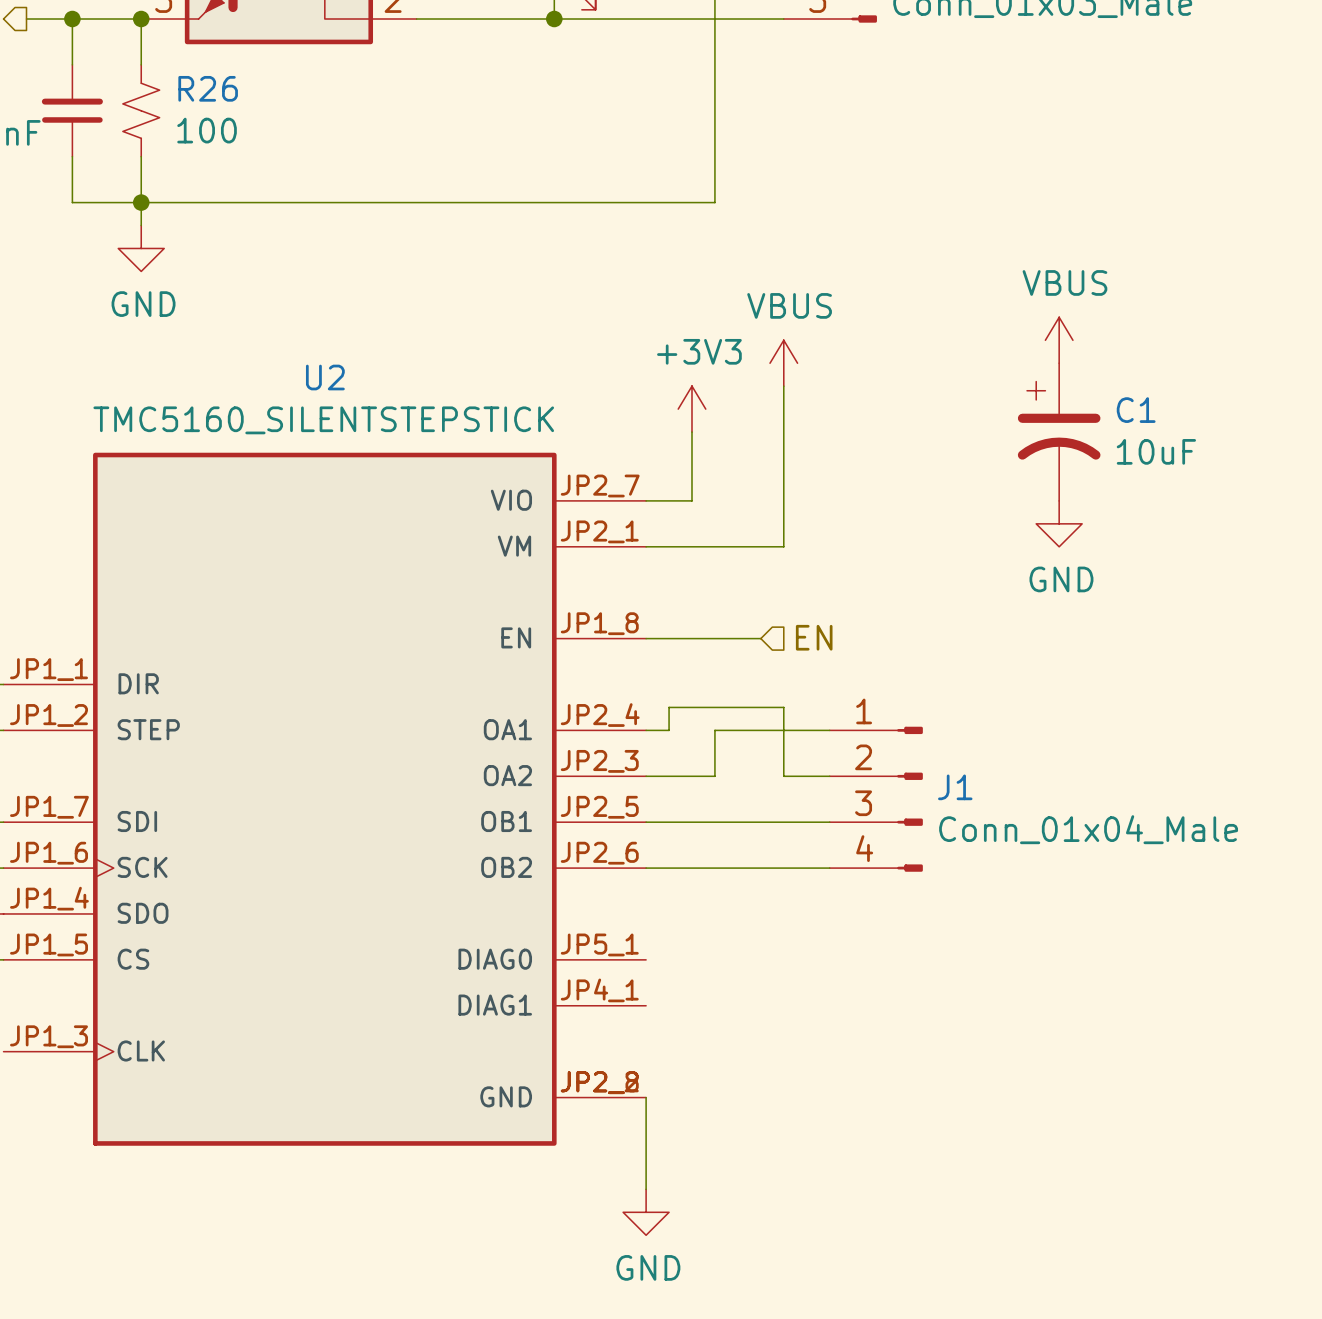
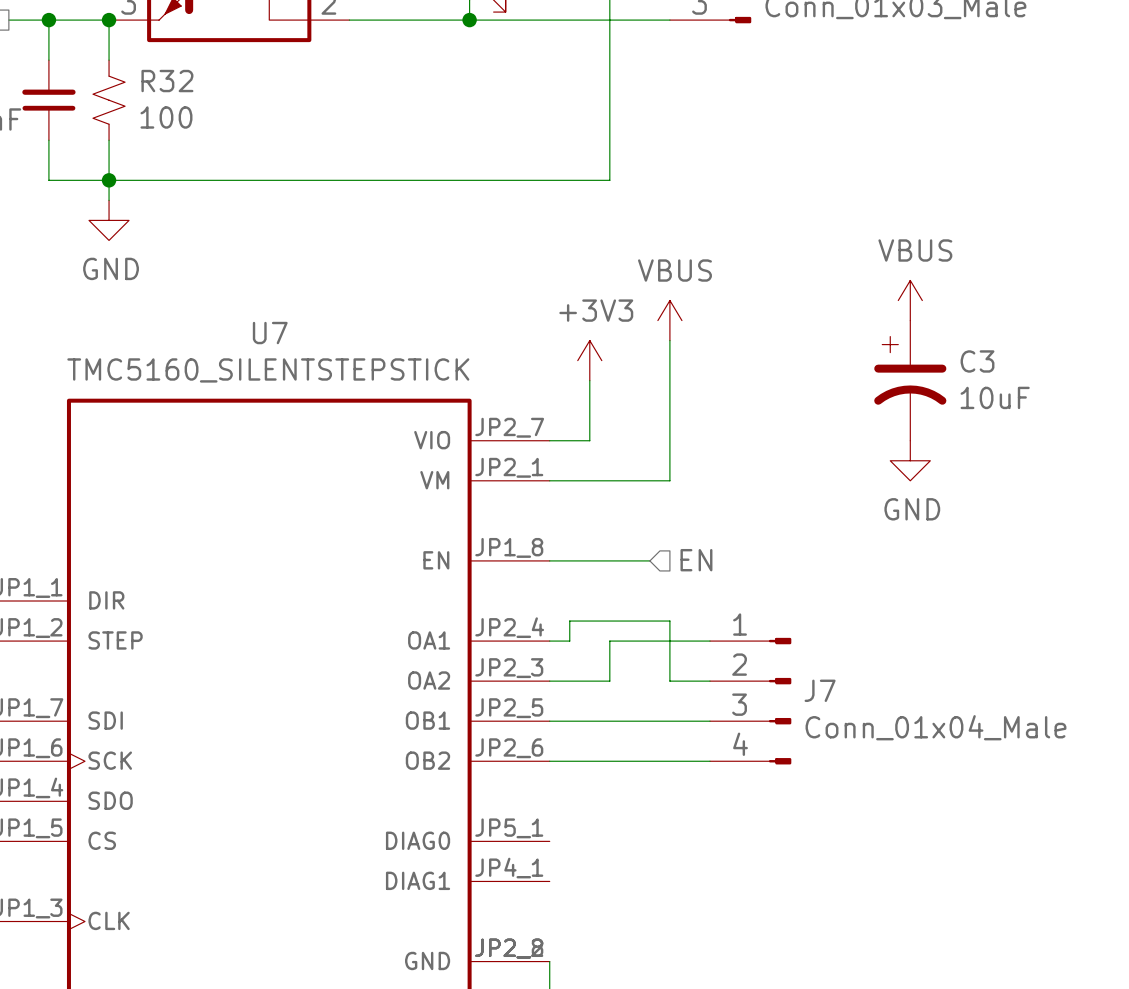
R26 name: R26 (208, 88) -> R32 (167, 81)
U2 name: U2 (325, 377) -> U7 (270, 333)
C1 name: C1 (1136, 410) -> C3 (977, 361)
J1 name: J1 (955, 787) -> J7 (820, 690)

